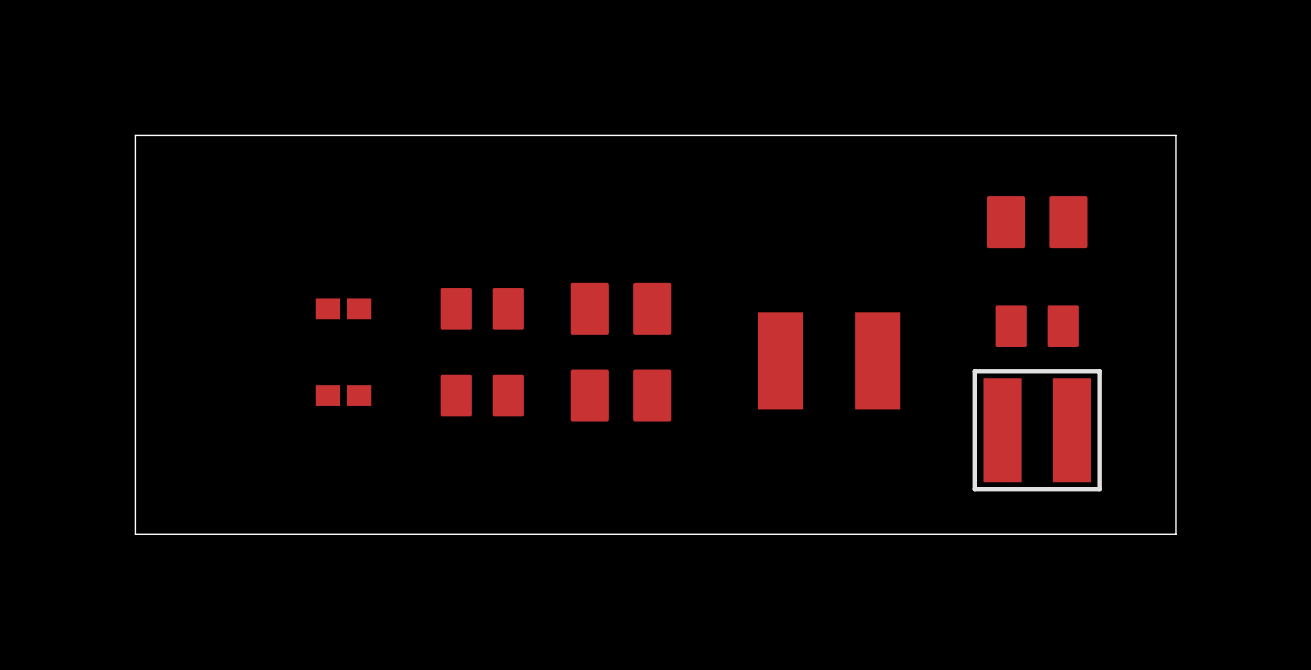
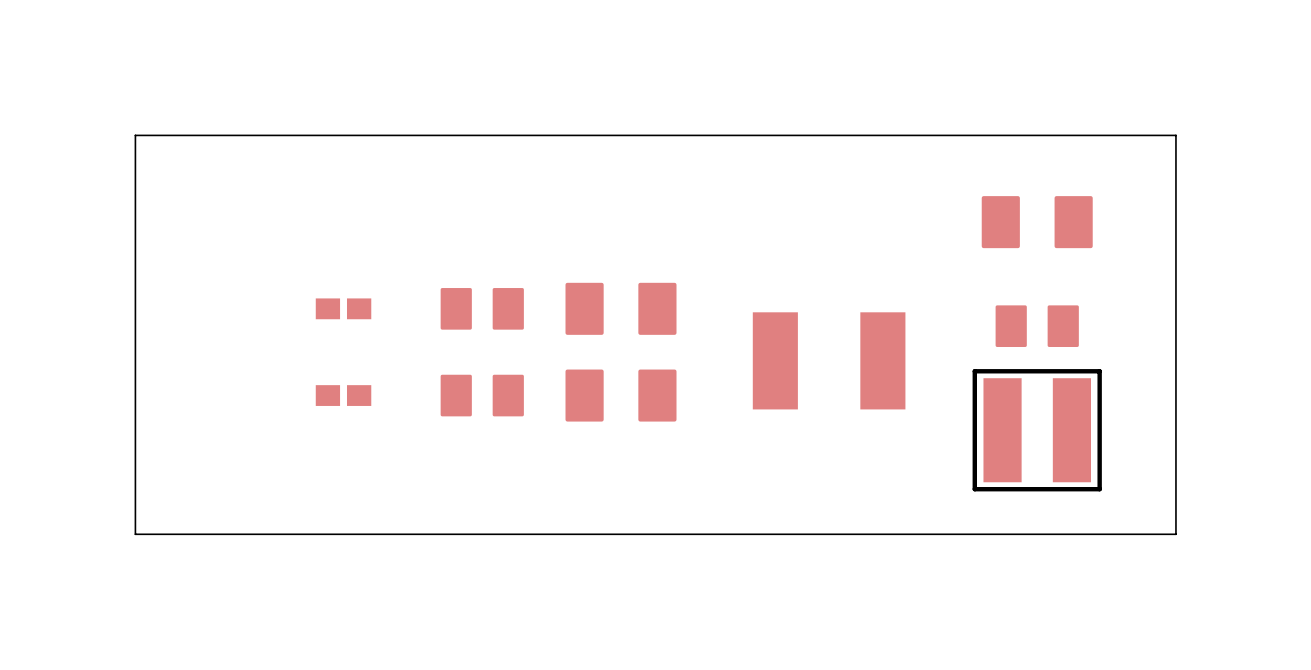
part footprint: [986, 196, 1088, 249] -> [981, 196, 1093, 249]
part footprint: [570, 282, 672, 335] -> [565, 282, 677, 335]
part footprint: [758, 312, 901, 410] -> [752, 312, 906, 410]
part footprint: [570, 369, 672, 422] -> [565, 369, 677, 422]

